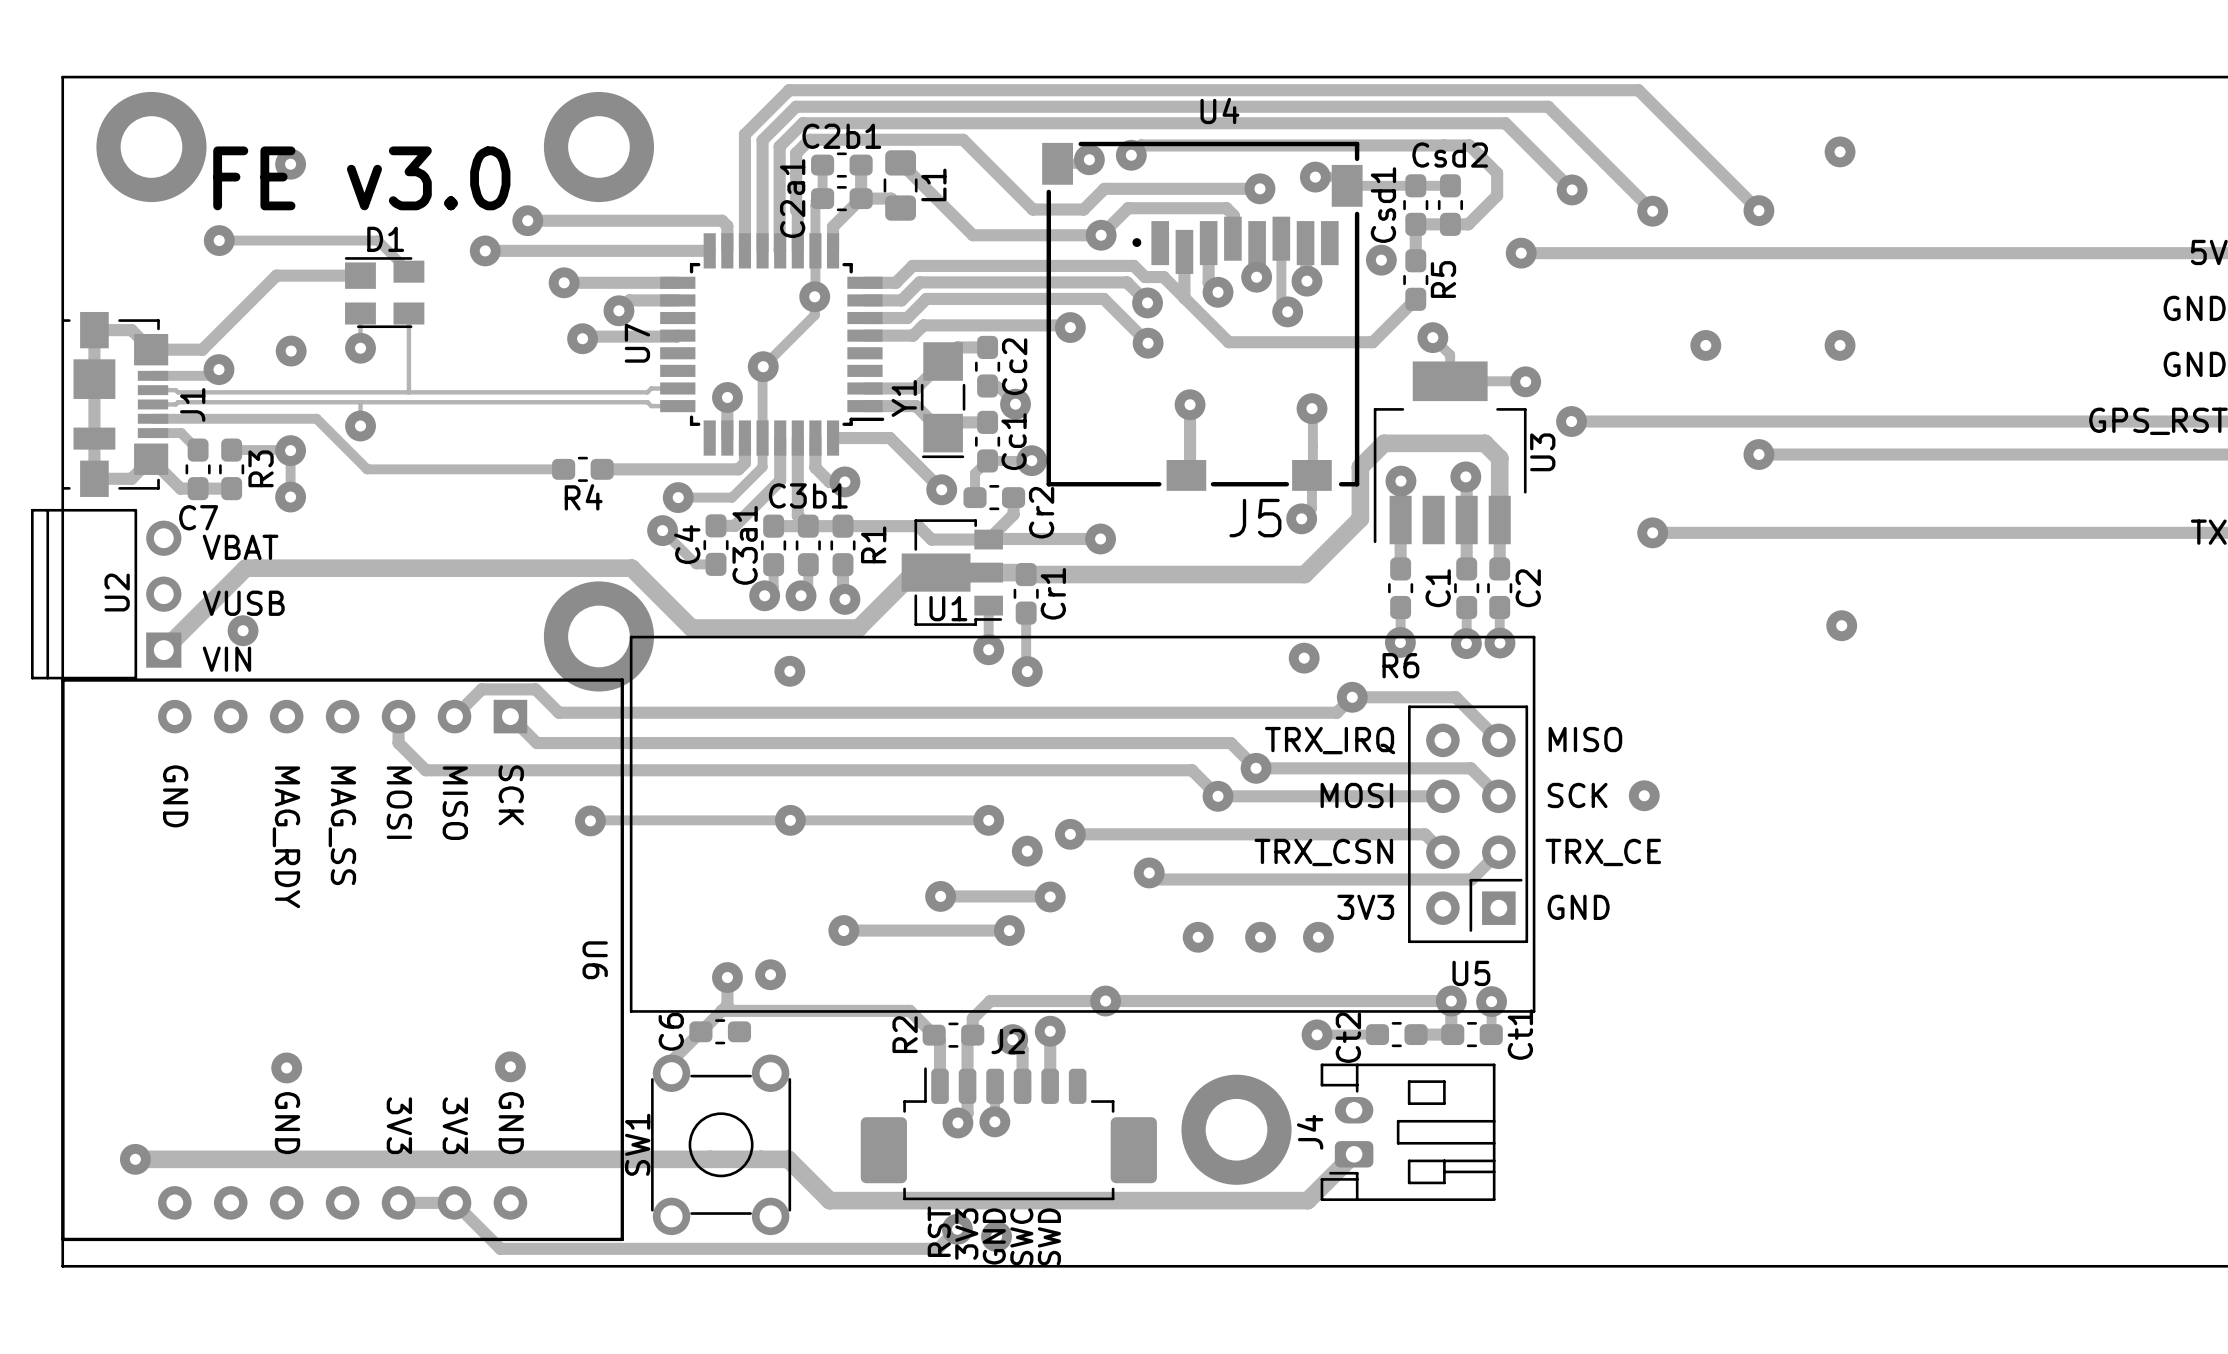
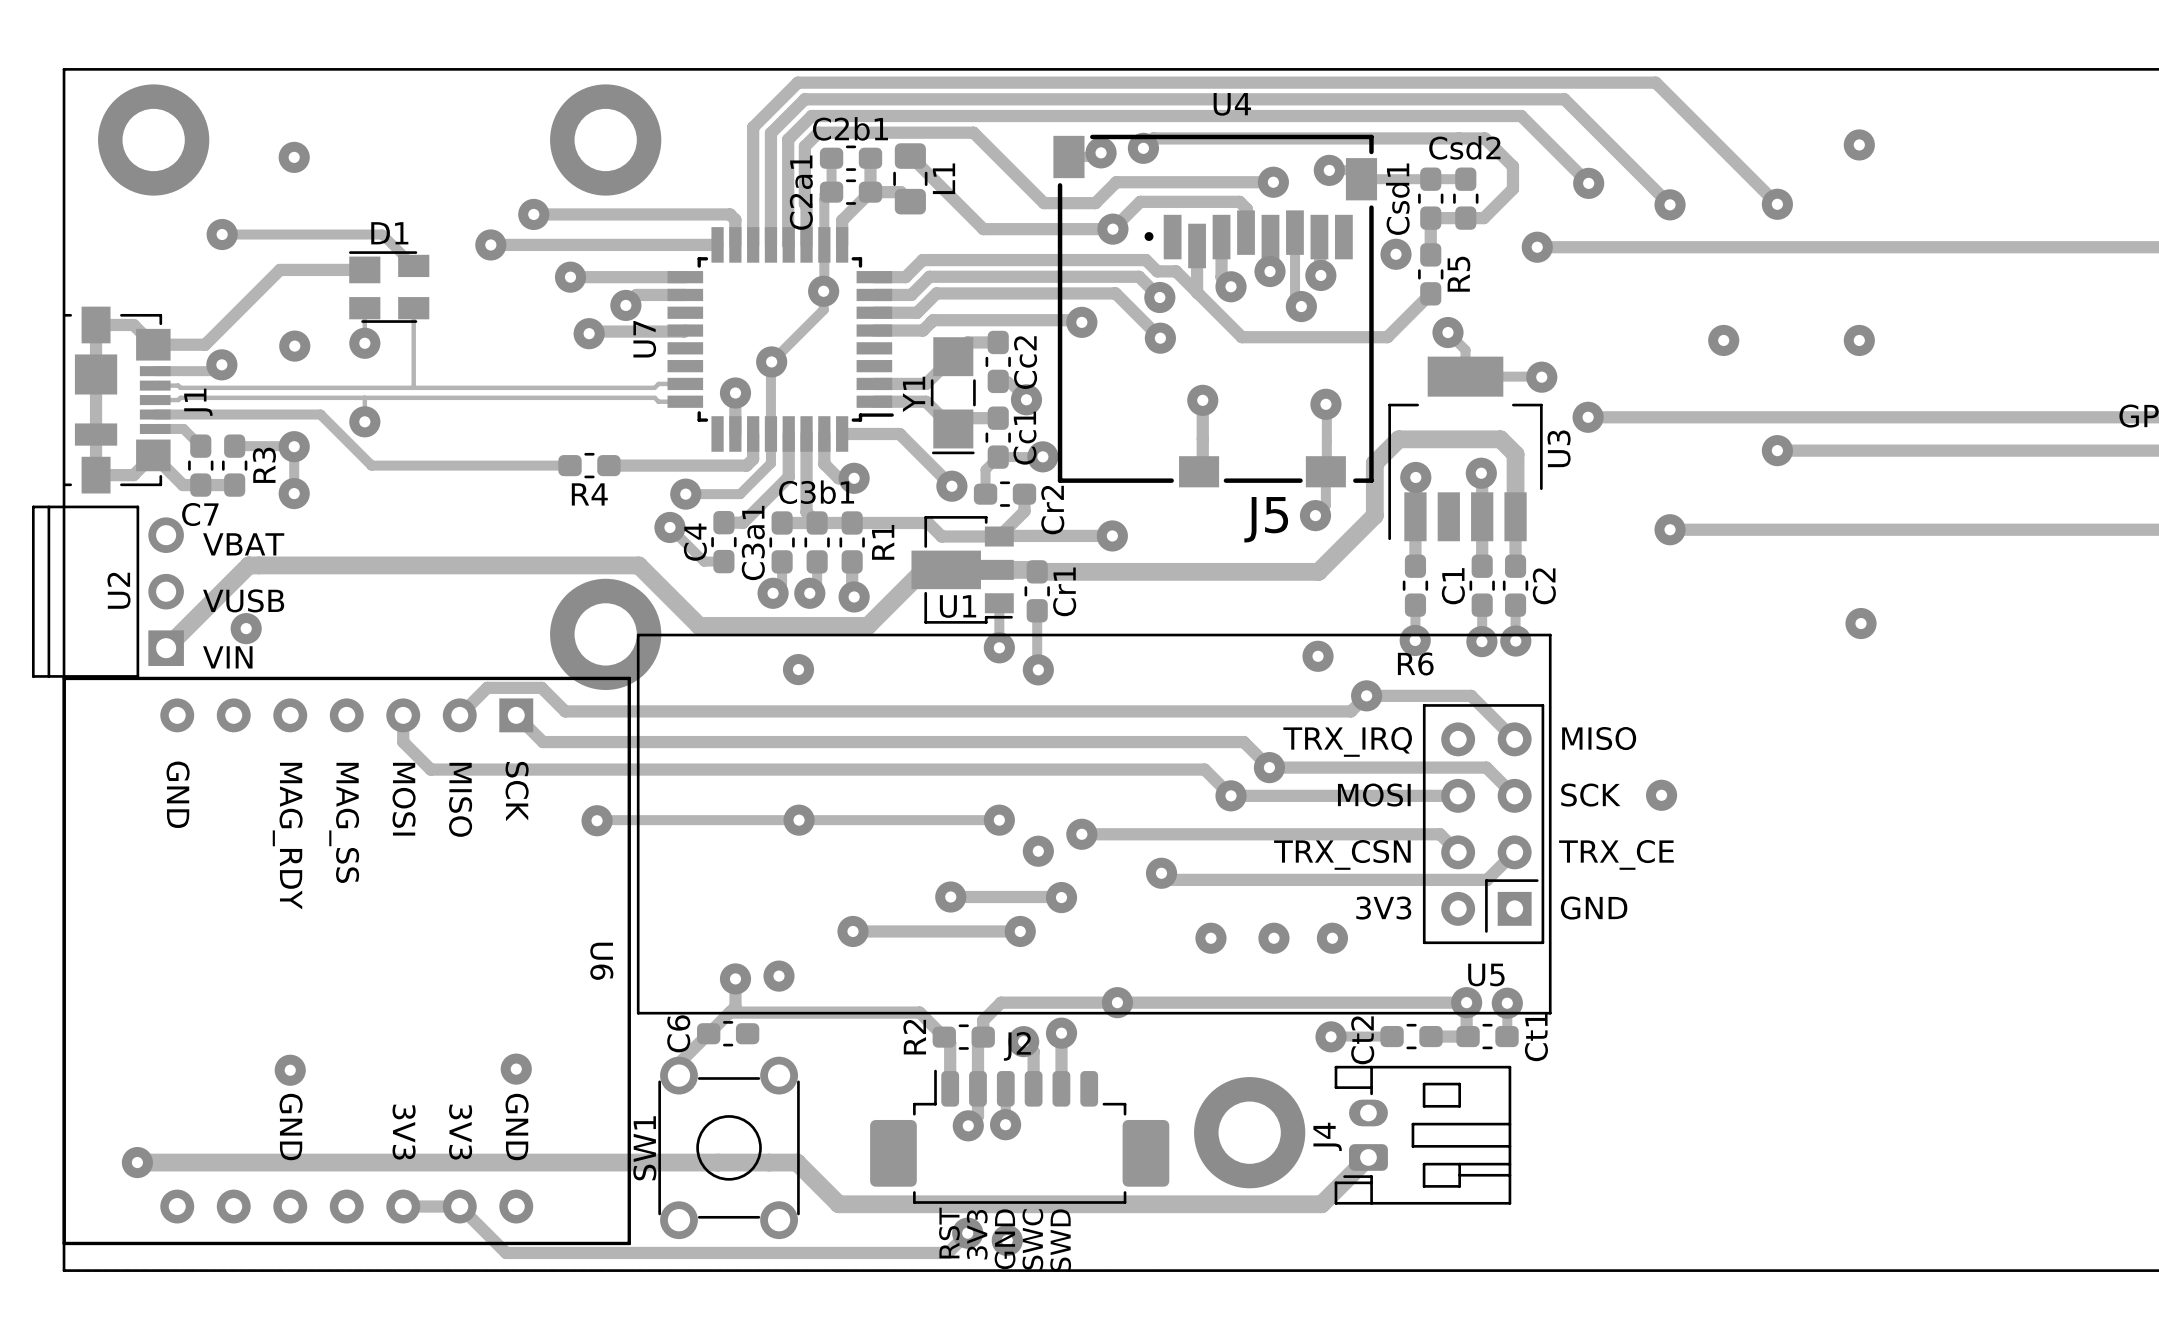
text: FE v3.0 (361, 178) -> none

